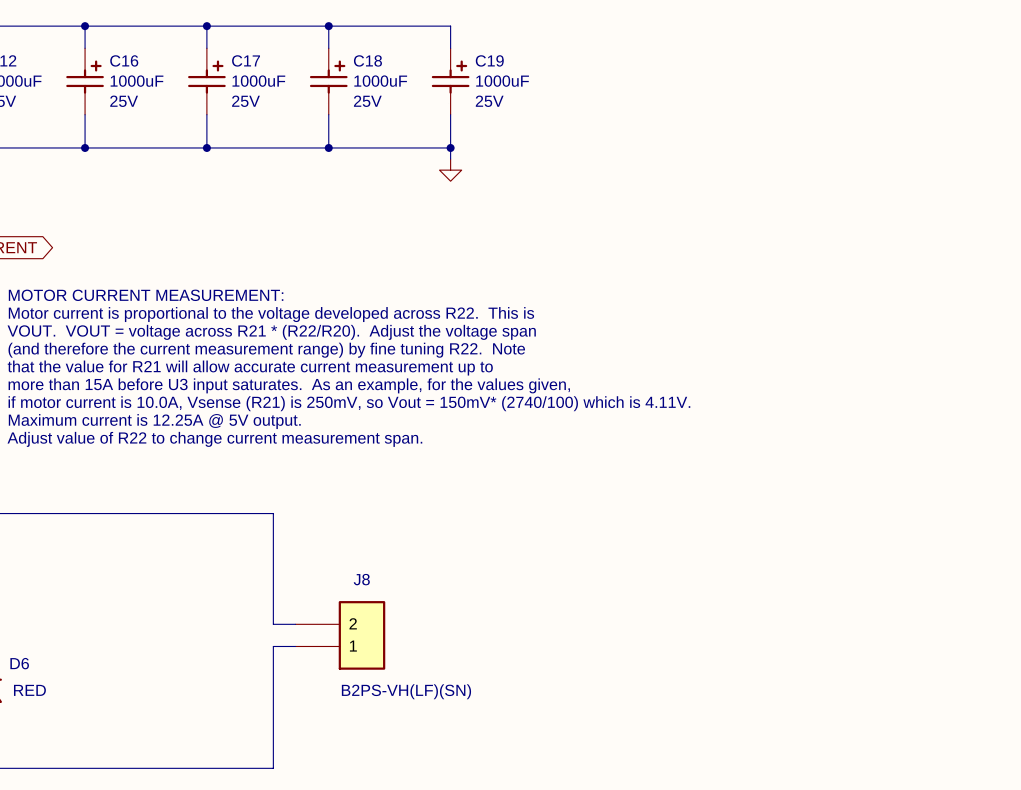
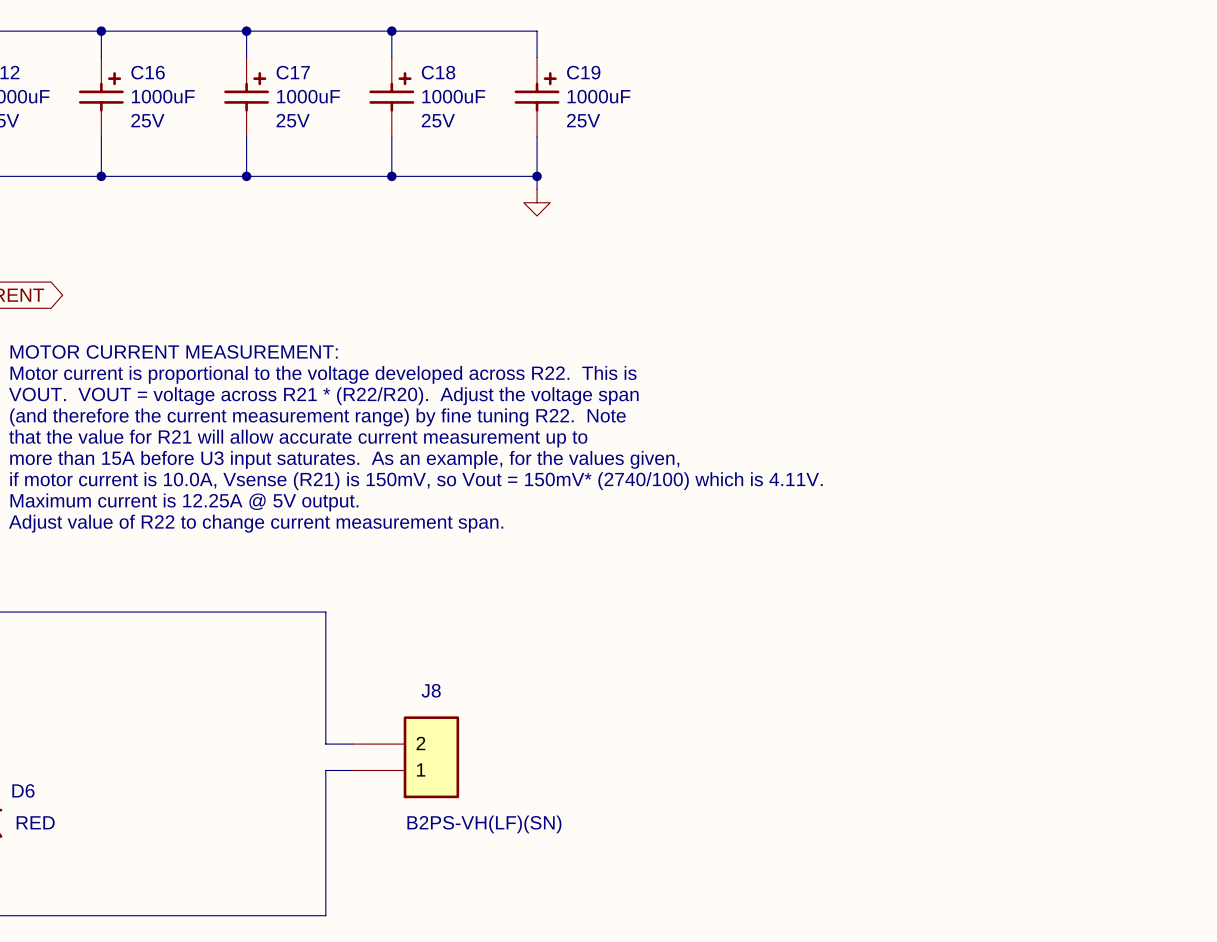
text: if motor current is 10.0A, Vsense (R21) is 250mV, so Vout = 150mV* (2740/100) which is 4.11V. (349, 403) -> if motor current is 10.0A, Vsense (R21) is 150mV, so Vout = 150mV* (2740/100) which is 4.11V. (416, 481)

